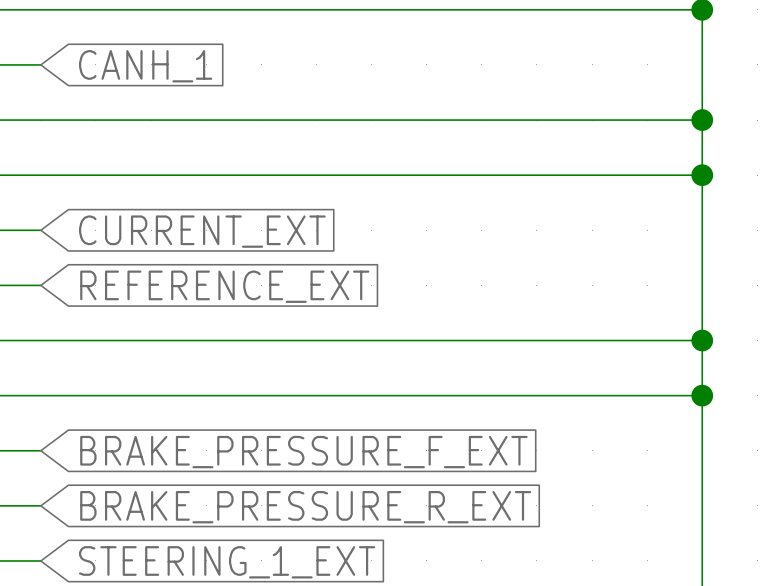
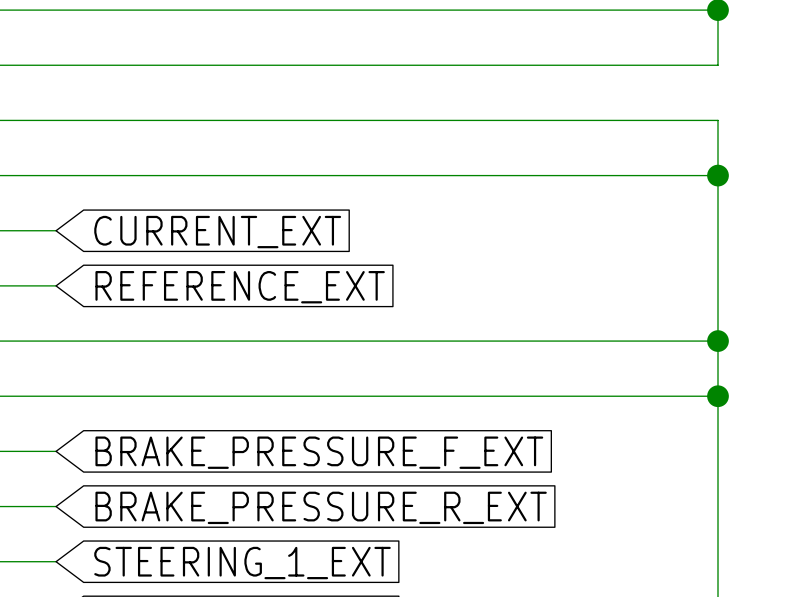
wire: (702, 64) (702, 120) -> (717, 65) (56, 65)
global label: CANH_1 (145, 66) -> none
junction: (702, 120) -> none

